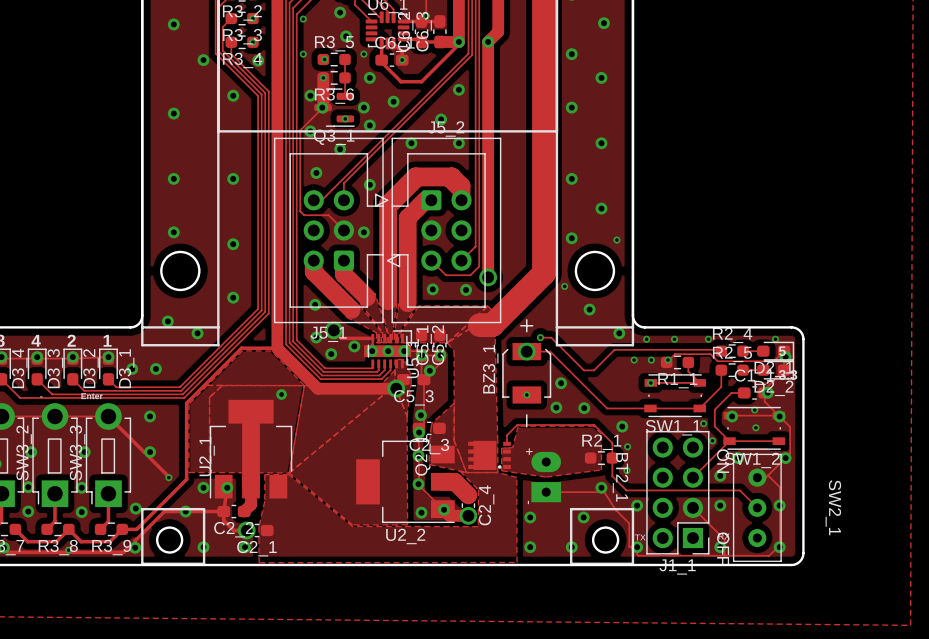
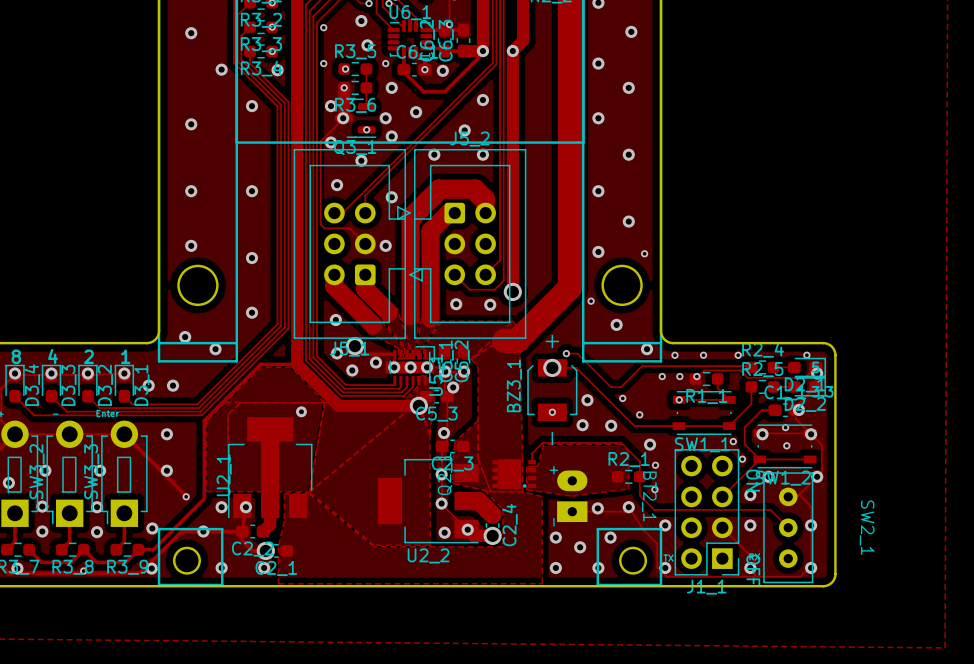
via: none -> (442, 70)
via: none -> (622, 398)
via: none -> (639, 414)
via: (419, 432) -> none
via: none -> (597, 508)
via: none -> (580, 547)

